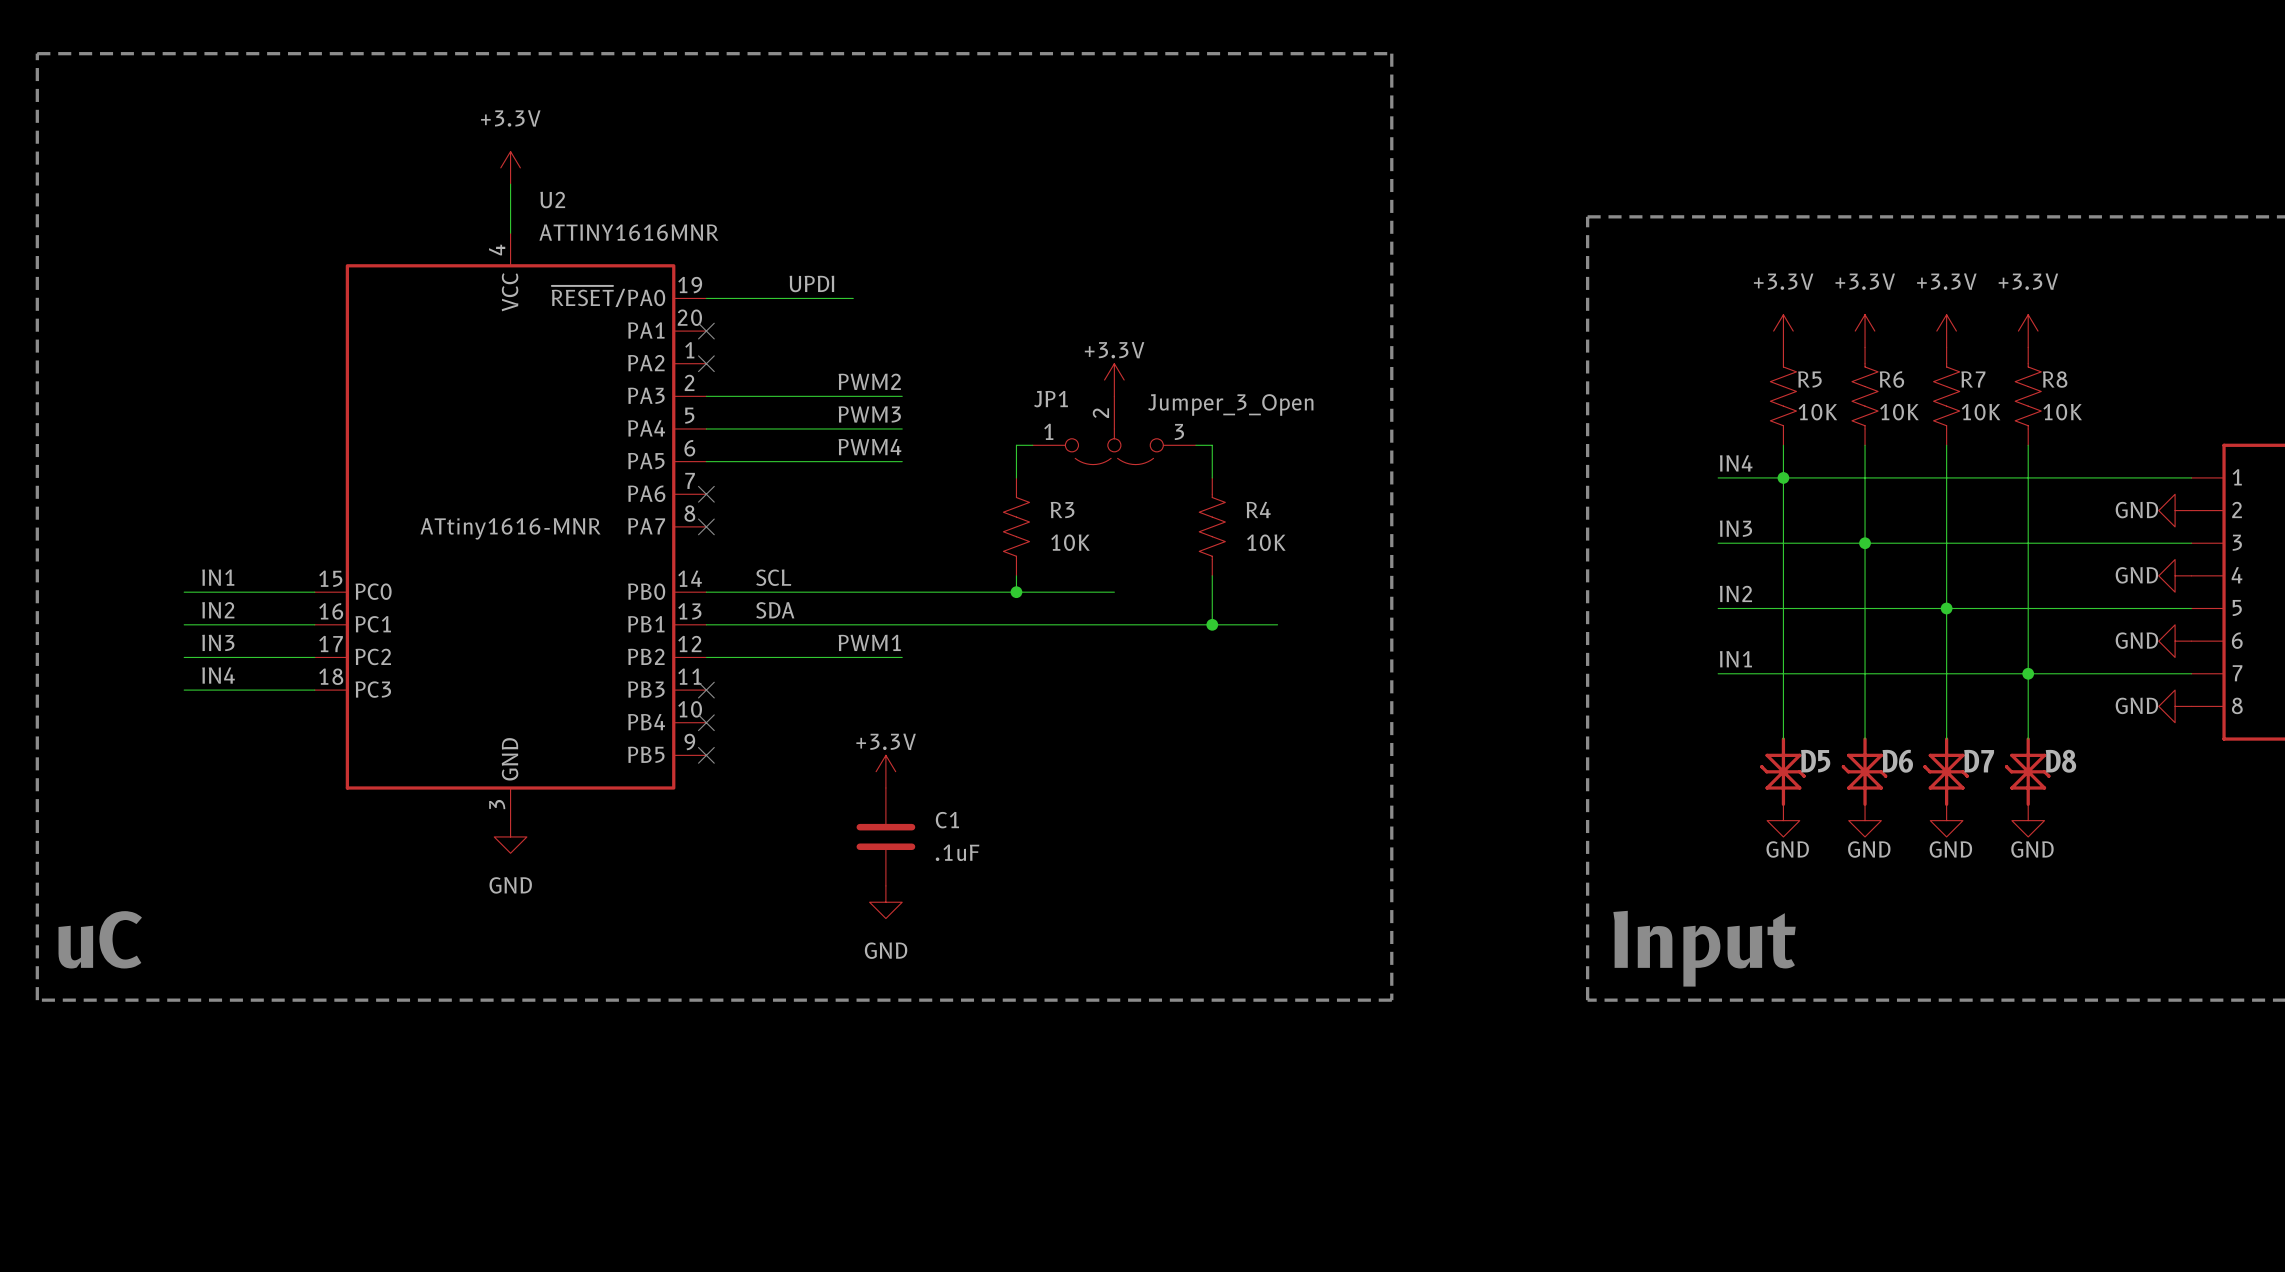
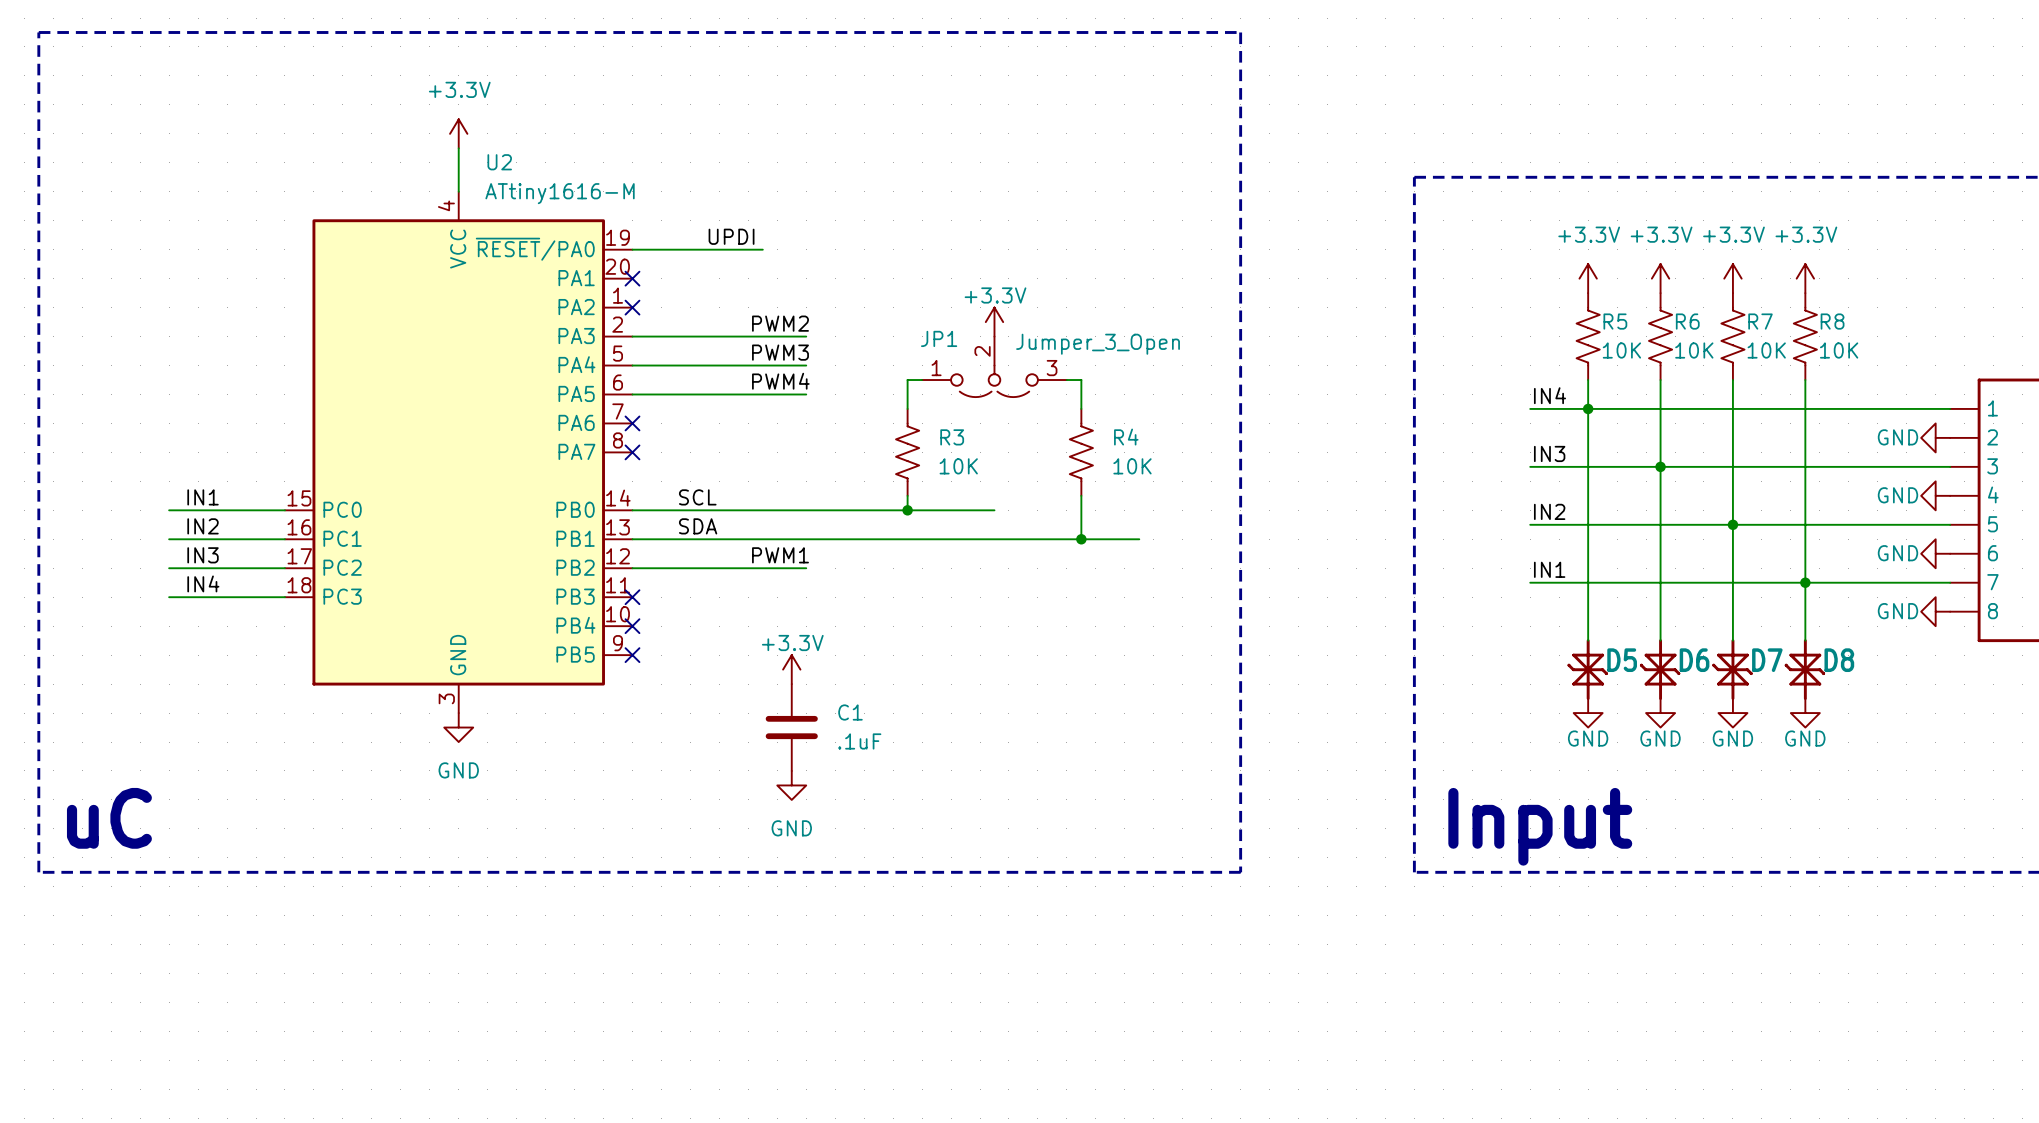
U2 value: ATTINY1616MNR (628, 232) -> ATtiny1616-M (560, 193)
U2 text: ATtiny1616-MNR (510, 528) -> none

